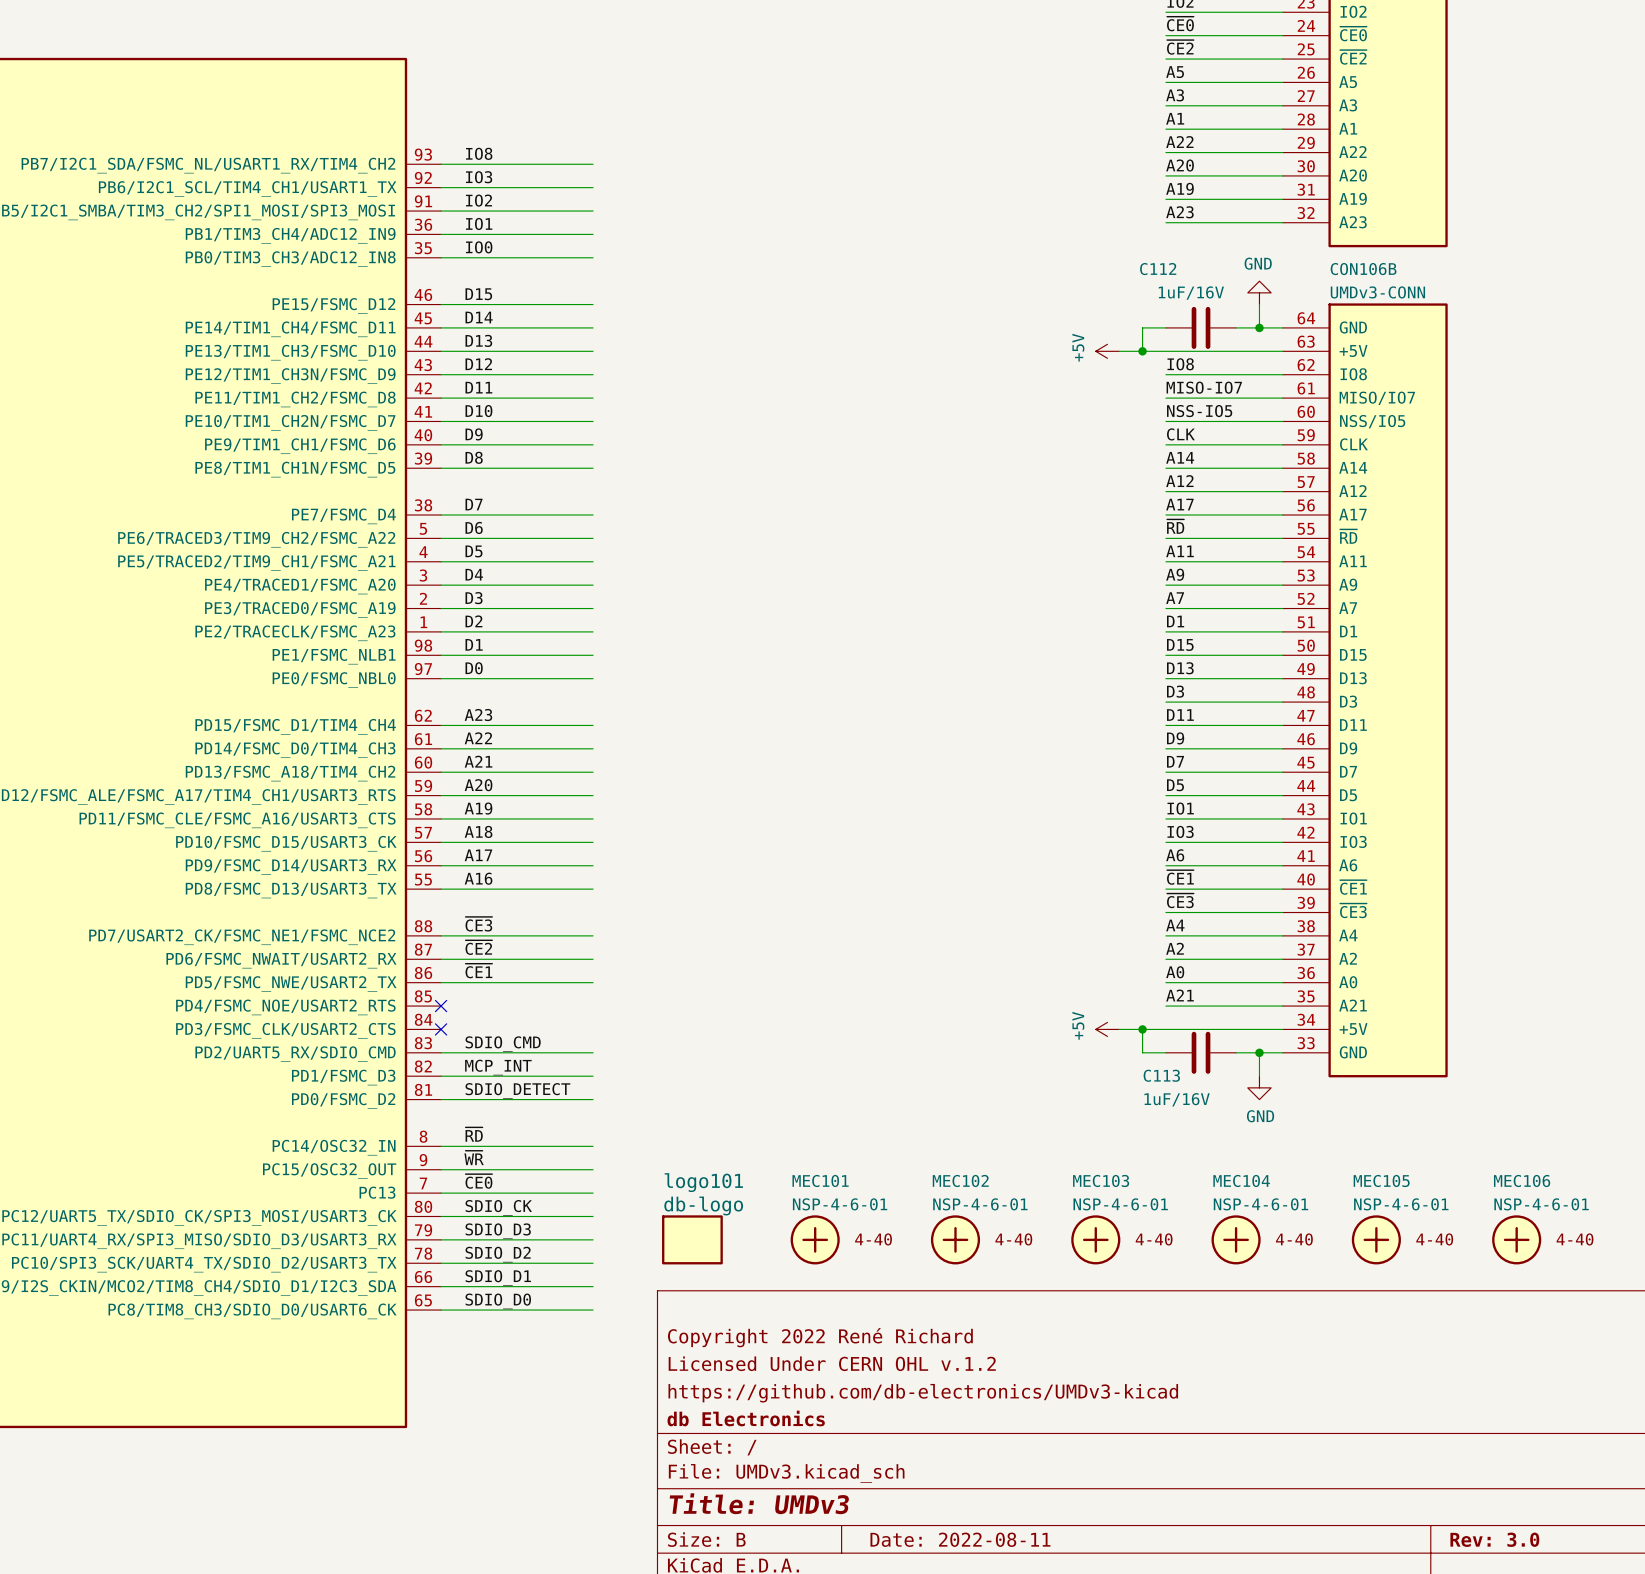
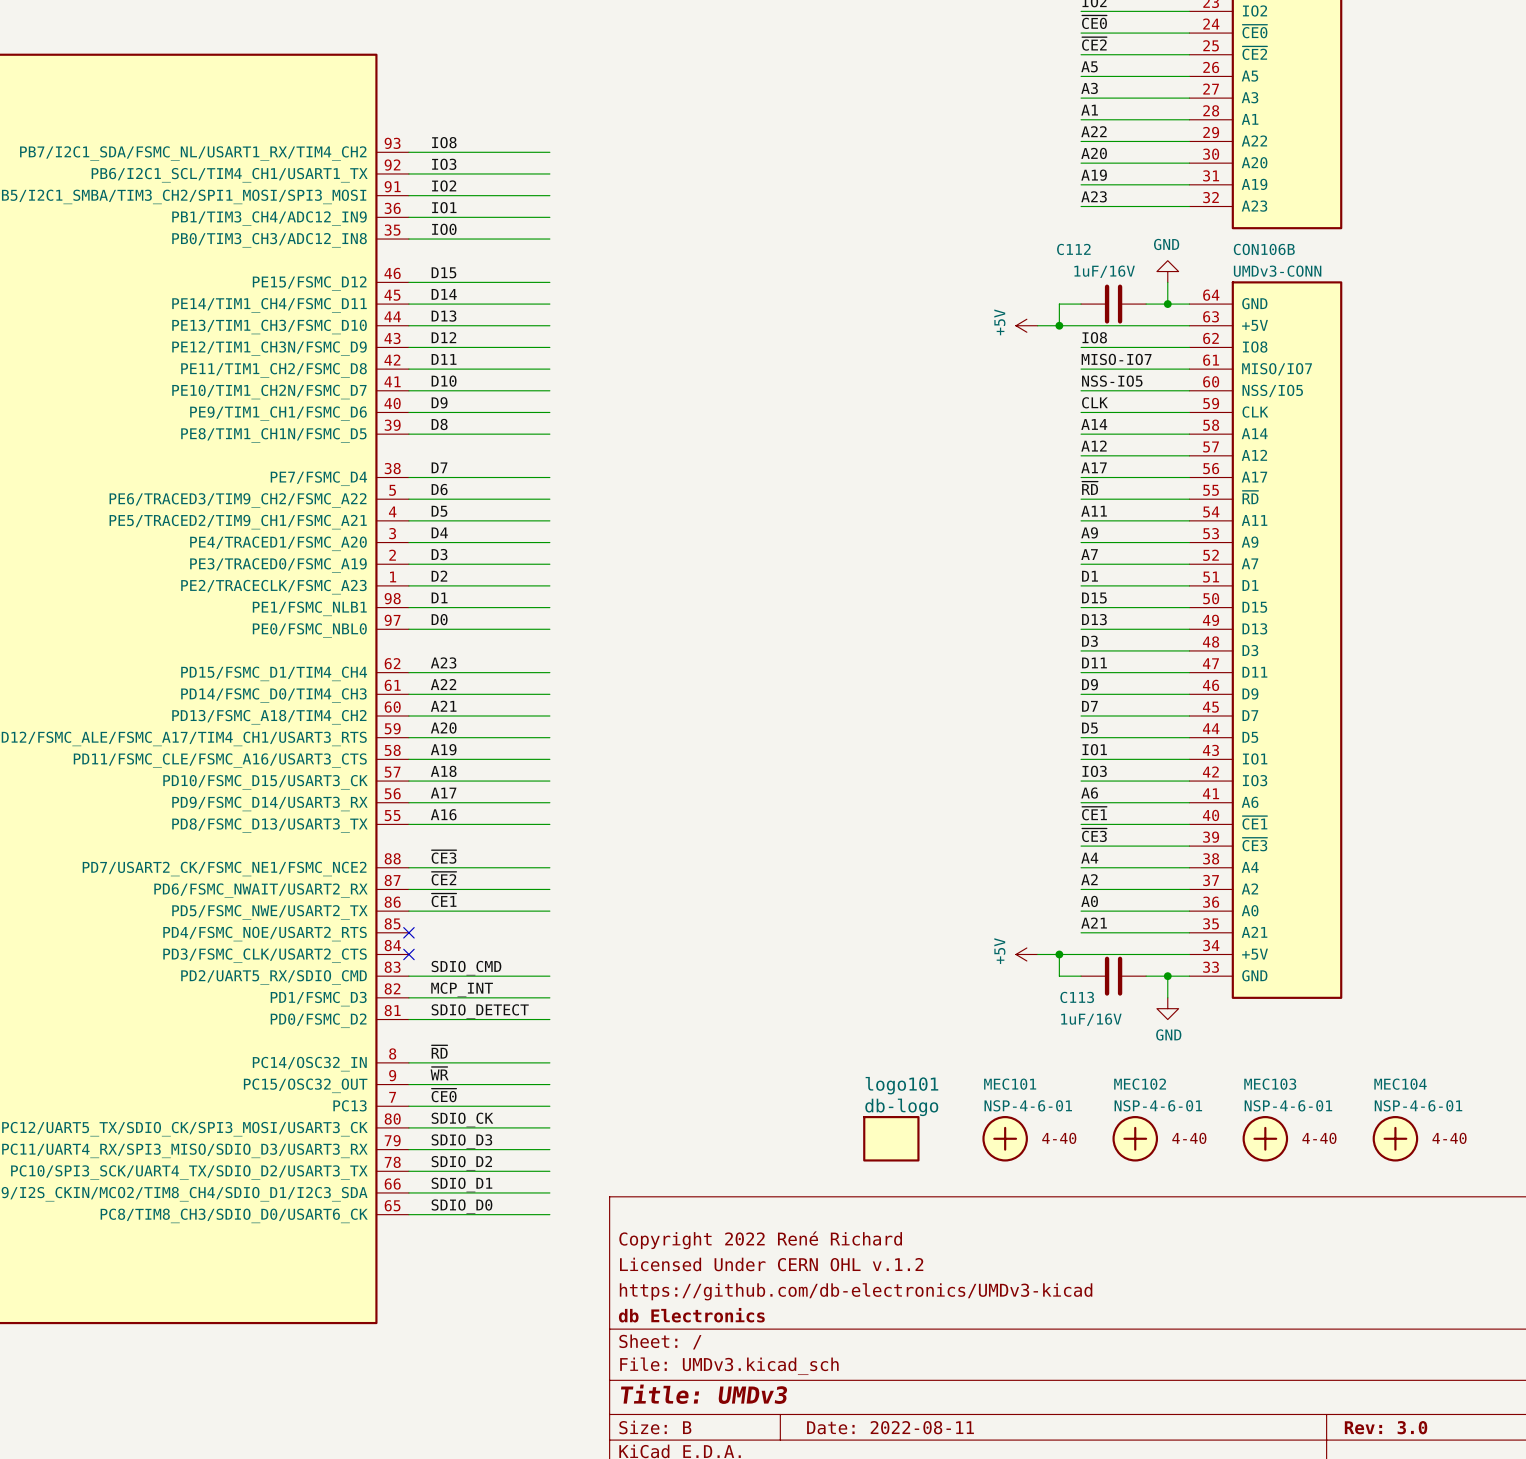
logo101 position: (692, 1239) -> (891, 1138)
MEC101 position: (815, 1239) -> (1005, 1138)
MEC102 position: (955, 1239) -> (1135, 1138)
MEC103 position: (1095, 1239) -> (1265, 1138)
MEC104 position: (1236, 1239) -> (1395, 1138)
MEC105: NSP-4-6-01 (1376, 1239) -> none
MEC106: NSP-4-6-01 (1516, 1239) -> none

